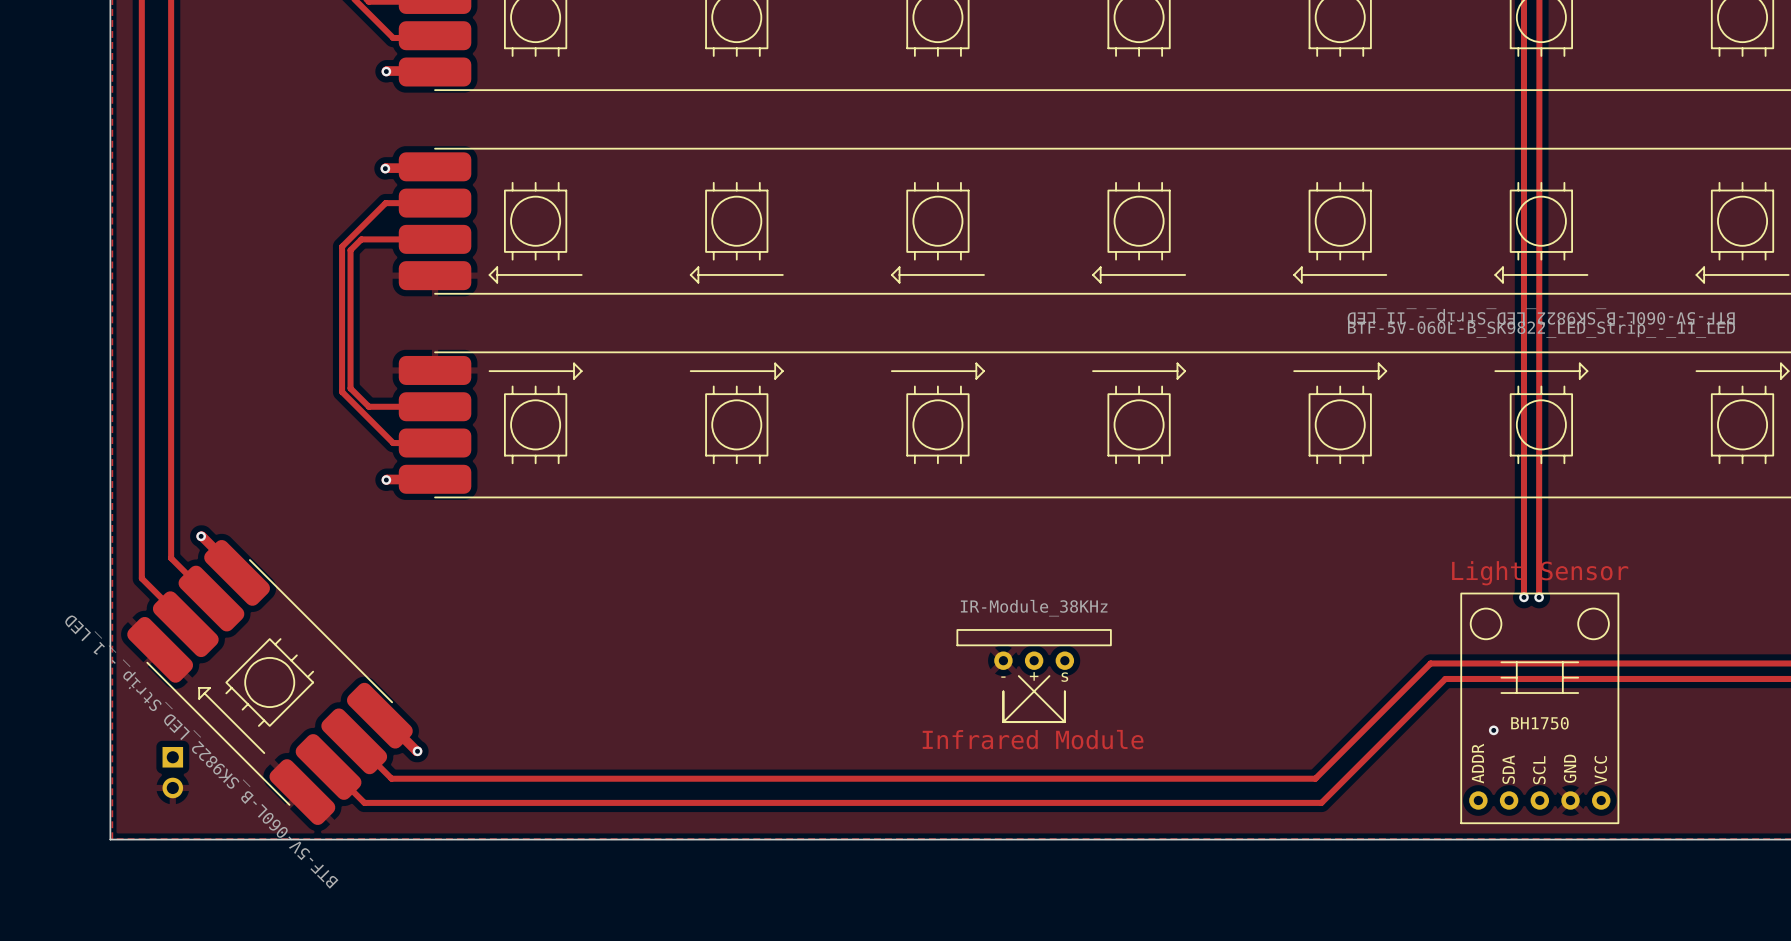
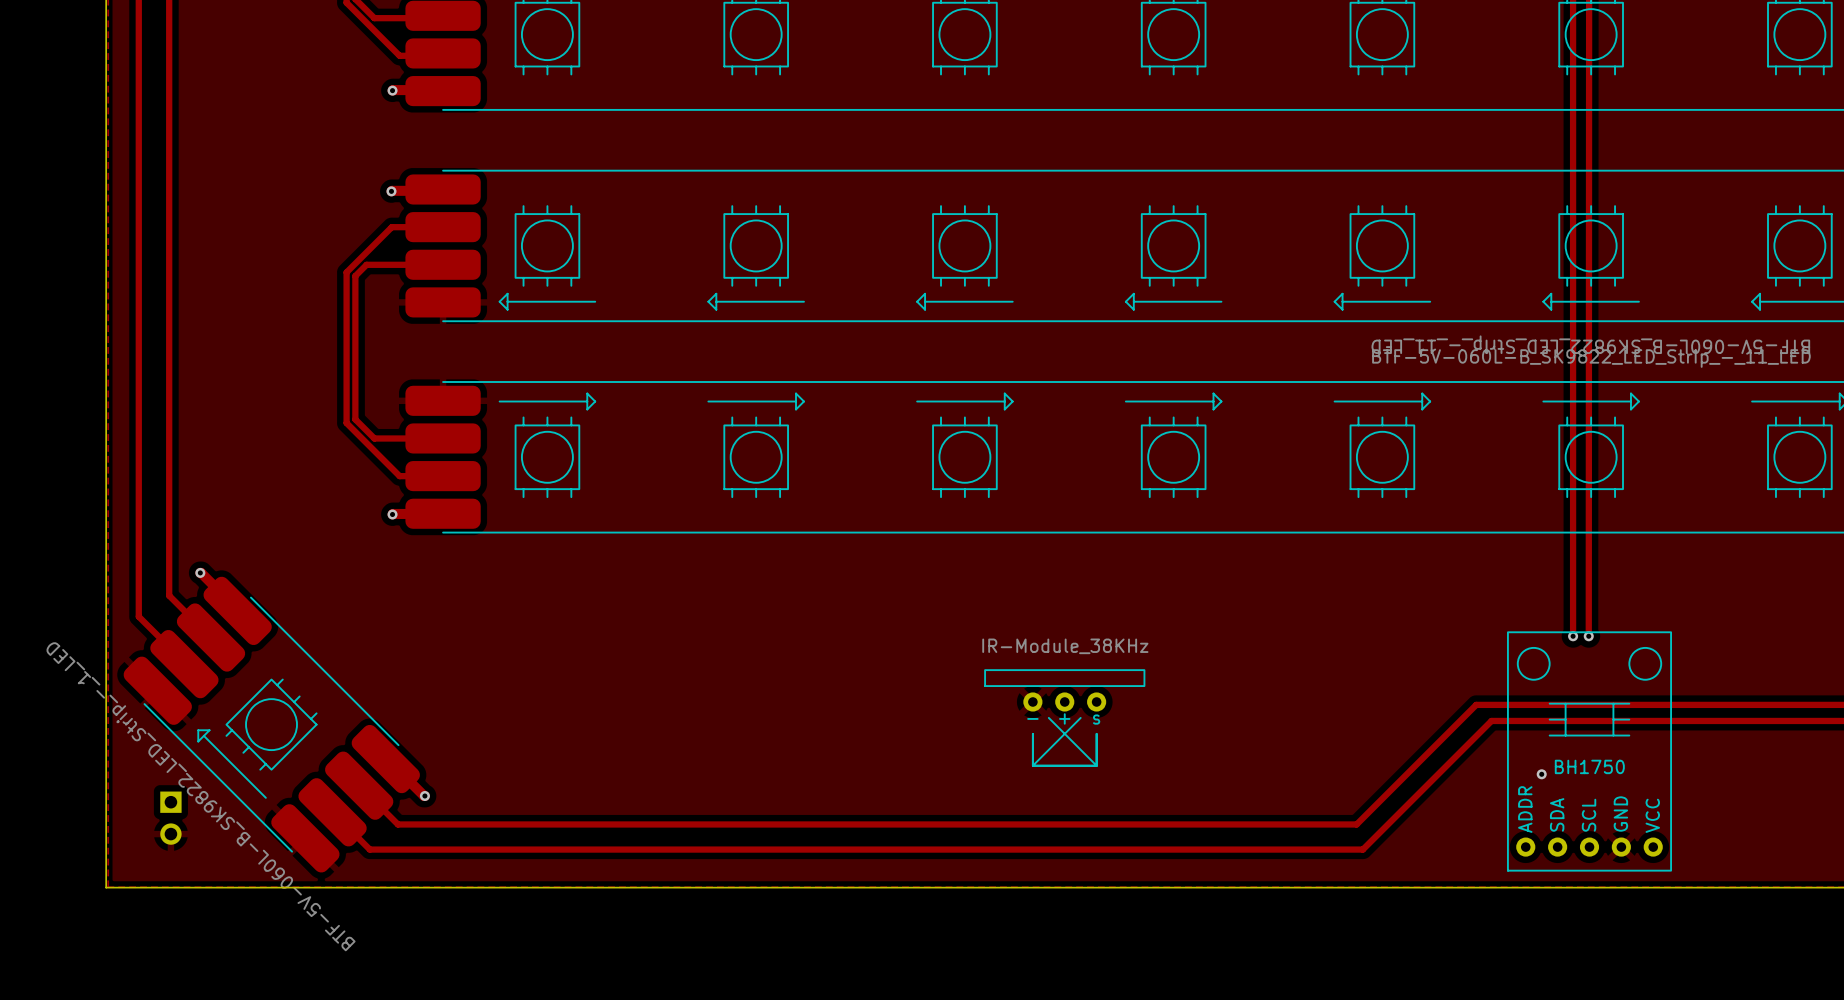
text: Light Sensor (1540, 573) -> none
text: Infrared Module (1033, 739) -> none

